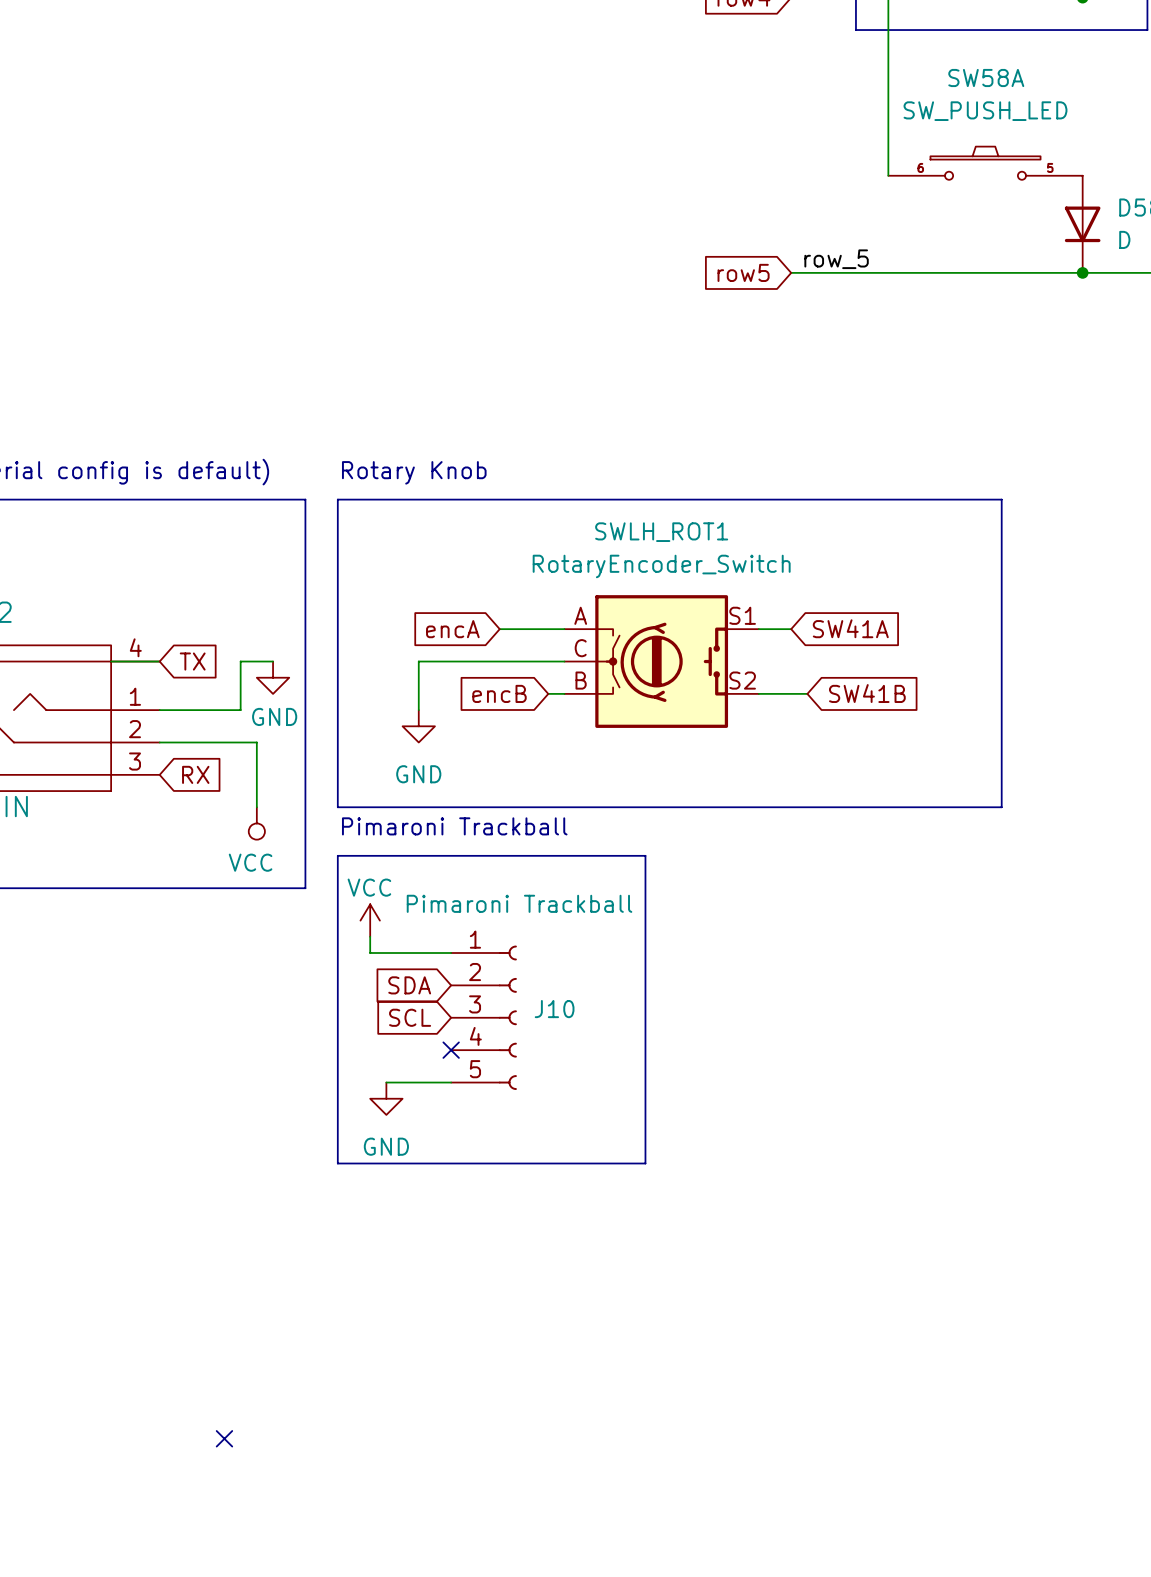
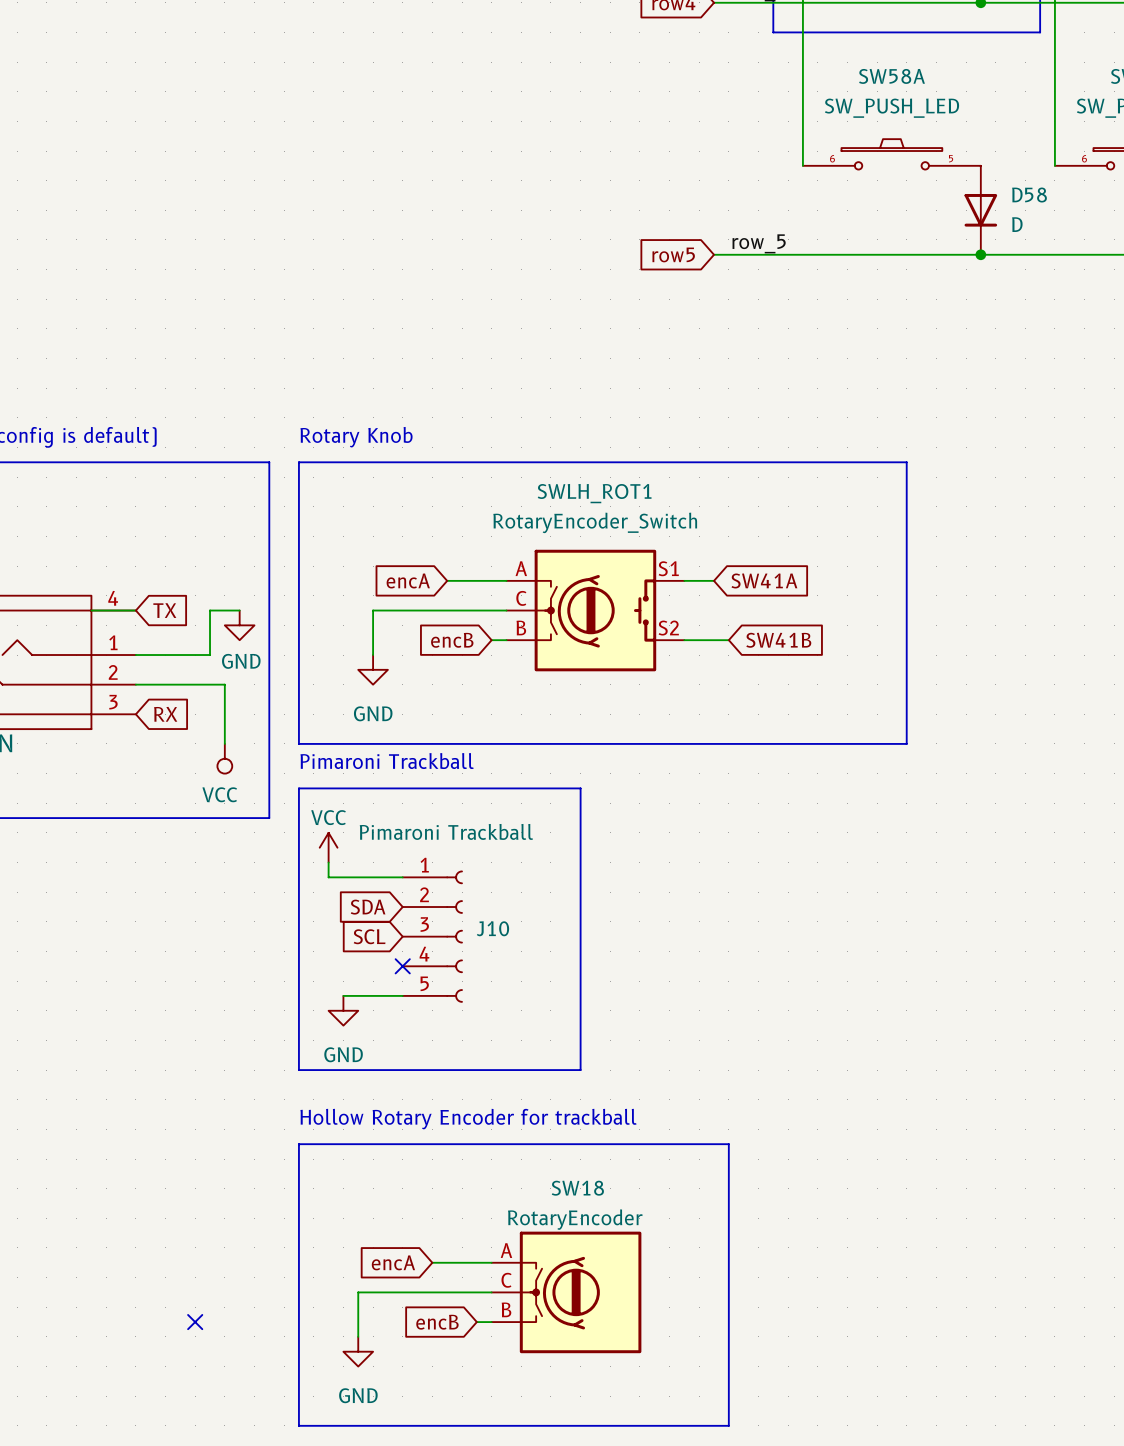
text: none -> Hollow Rotary Encoder for trackball (468, 1119)
line: none -> (298, 1144) (728, 1144) (728, 1425) (298, 1425) (298, 1144)
global label: none -> encA (393, 1262)
wire: none -> (432, 1262) (491, 1262)
wire: none -> (491, 1292) (358, 1292) (358, 1336)
SW18: none -> RotaryEncoder (566, 1292)
global label: none -> encB (437, 1322)
wire: none -> (476, 1322) (491, 1322)
power symbol: none -> GND (358, 1351)

